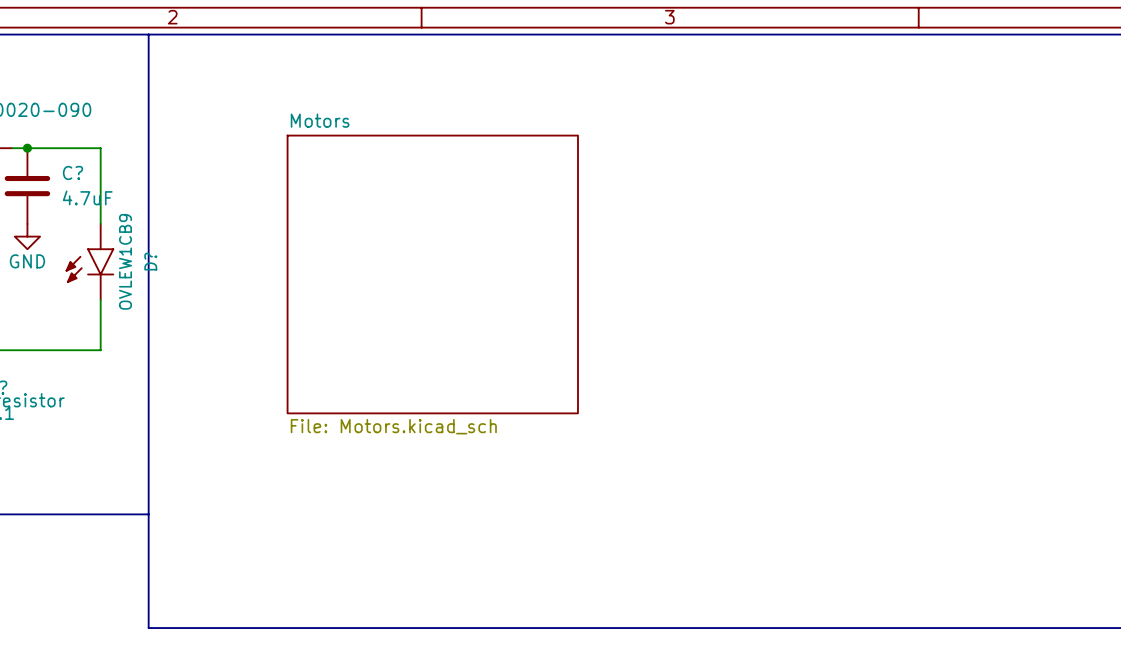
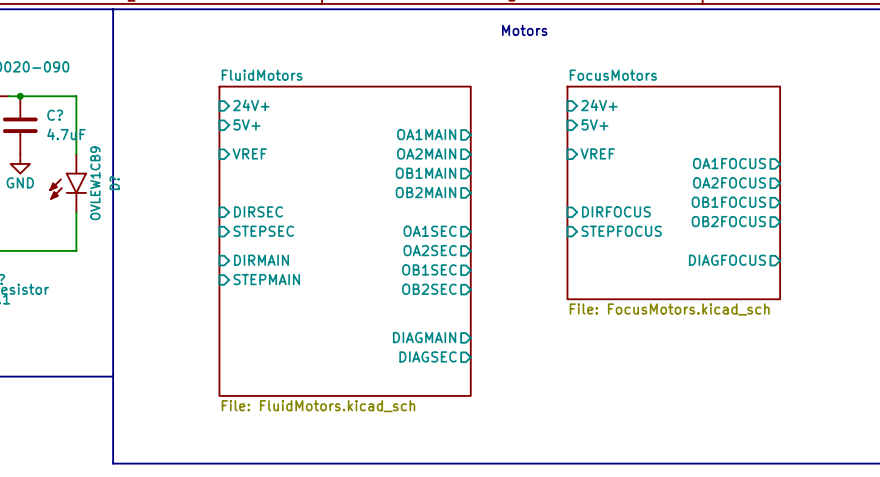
text: none -> Motors (524, 30)
sheet pin: none -> 24V+ (251, 105)
sheet pin: none -> 24V+ (599, 105)
sheet pin: none -> 5V+ (246, 124)
sheet pin: none -> 5V+ (594, 124)
sheet pin: none -> OA1MAIN (426, 134)
sheet pin: none -> VREF (249, 153)
sheet pin: none -> OA2MAIN (426, 153)
sheet pin: none -> VREF (597, 153)
sheet pin: none -> OA1FOCUS (729, 163)
sheet pin: none -> OB1MAIN (425, 173)
sheet pin: none -> OA2FOCUS (729, 182)
sheet Motors: File: Motors.kicad_sch (432, 274) -> none
sheet pin: none -> OB2MAIN (425, 192)
sheet FocusMotors: none -> File: FocusMotors.kicad_sch (673, 192)
sheet pin: none -> OB1FOCUS (728, 202)
sheet pin: none -> DIRSEC (258, 211)
sheet pin: none -> DIRFOCUS (616, 211)
sheet pin: none -> OB2FOCUS (728, 221)
sheet pin: none -> STEPSEC (263, 231)
sheet pin: none -> OA1SEC (430, 231)
sheet pin: none -> STEPFOCUS (621, 231)
sheet FluidMotors: none -> File: FluidMotors.kicad_sch (345, 241)
sheet pin: none -> OA2SEC (430, 250)
sheet pin: none -> DIRMAIN (261, 260)
sheet pin: none -> DIAGFOCUS (727, 260)
sheet pin: none -> OB1SEC (429, 269)
sheet pin: none -> STEPMAIN (266, 279)
sheet pin: none -> OB2SEC (429, 289)
sheet pin: none -> DIAGMAIN (424, 337)
sheet pin: none -> DIAGSEC (428, 356)

